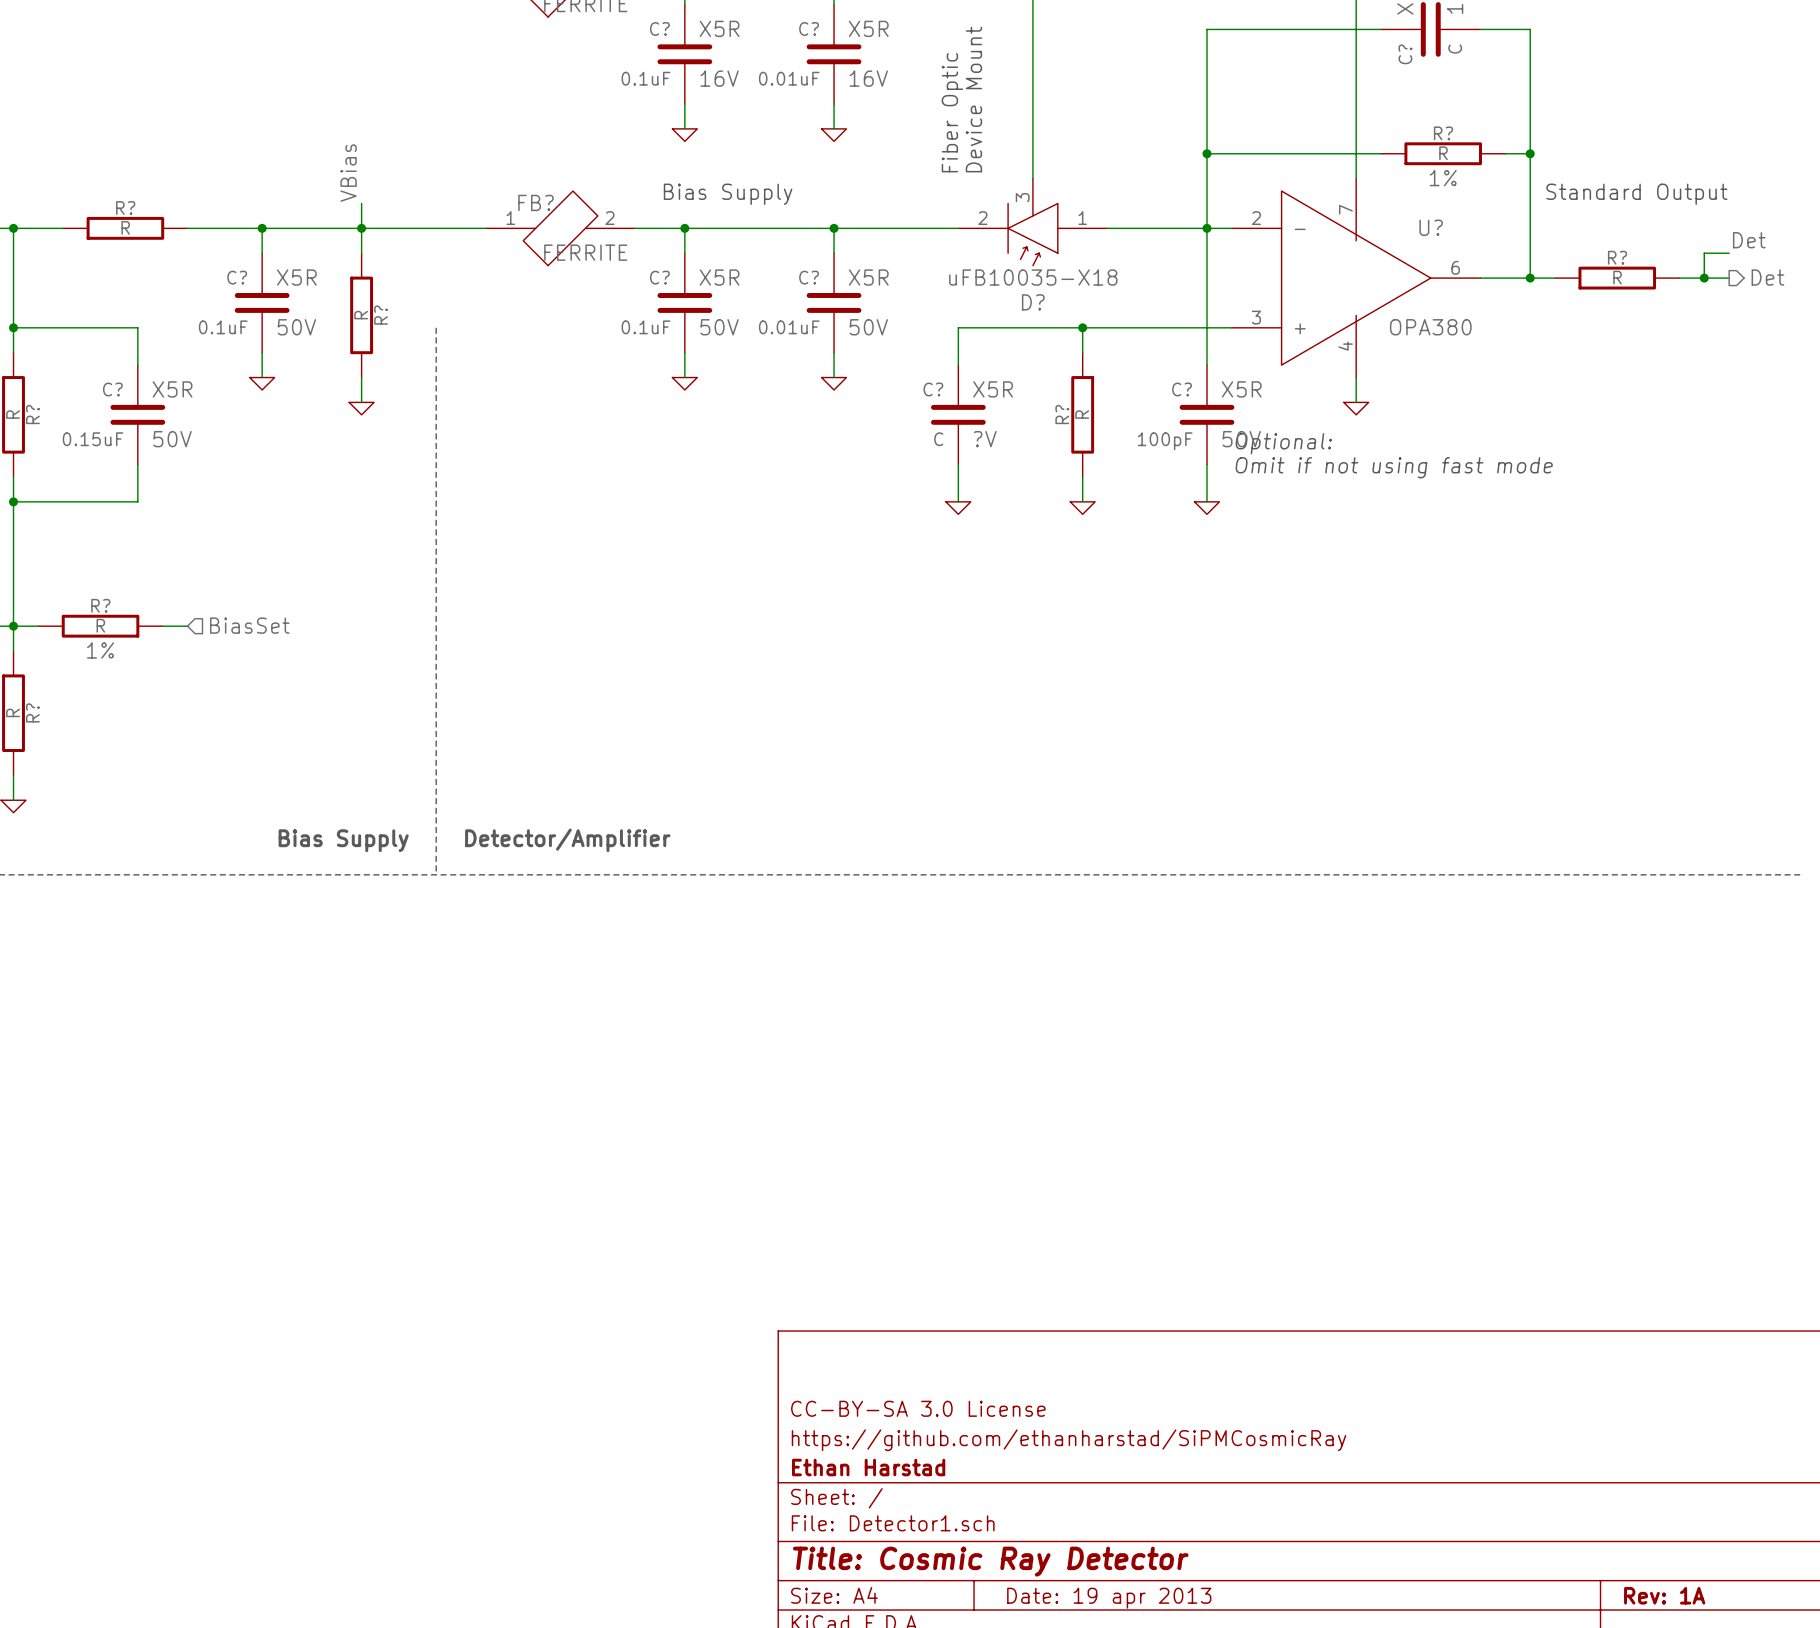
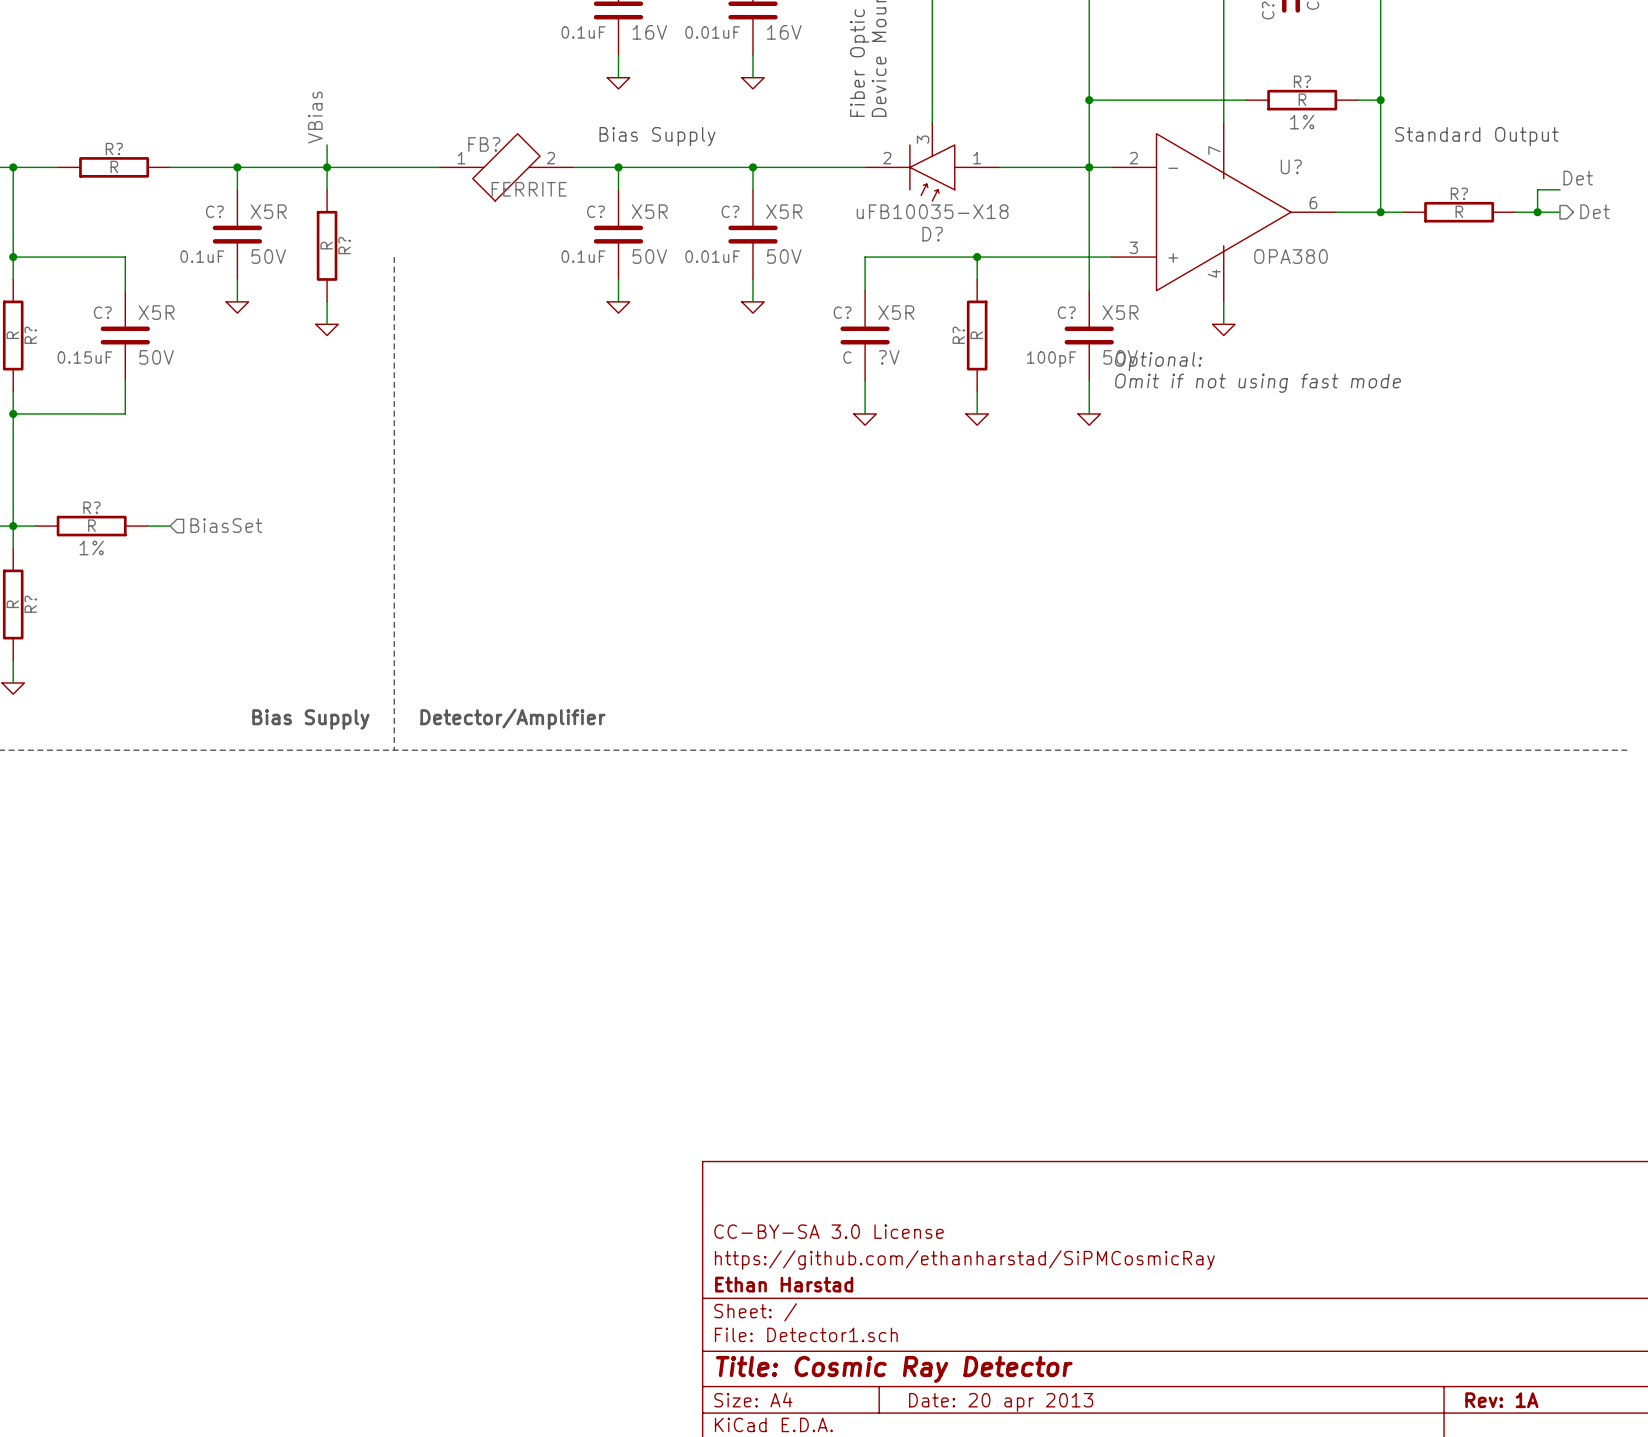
title block: Date: 19 apr 2013 (1109, 1598) -> Date: 20 apr 2013 (1001, 1402)

